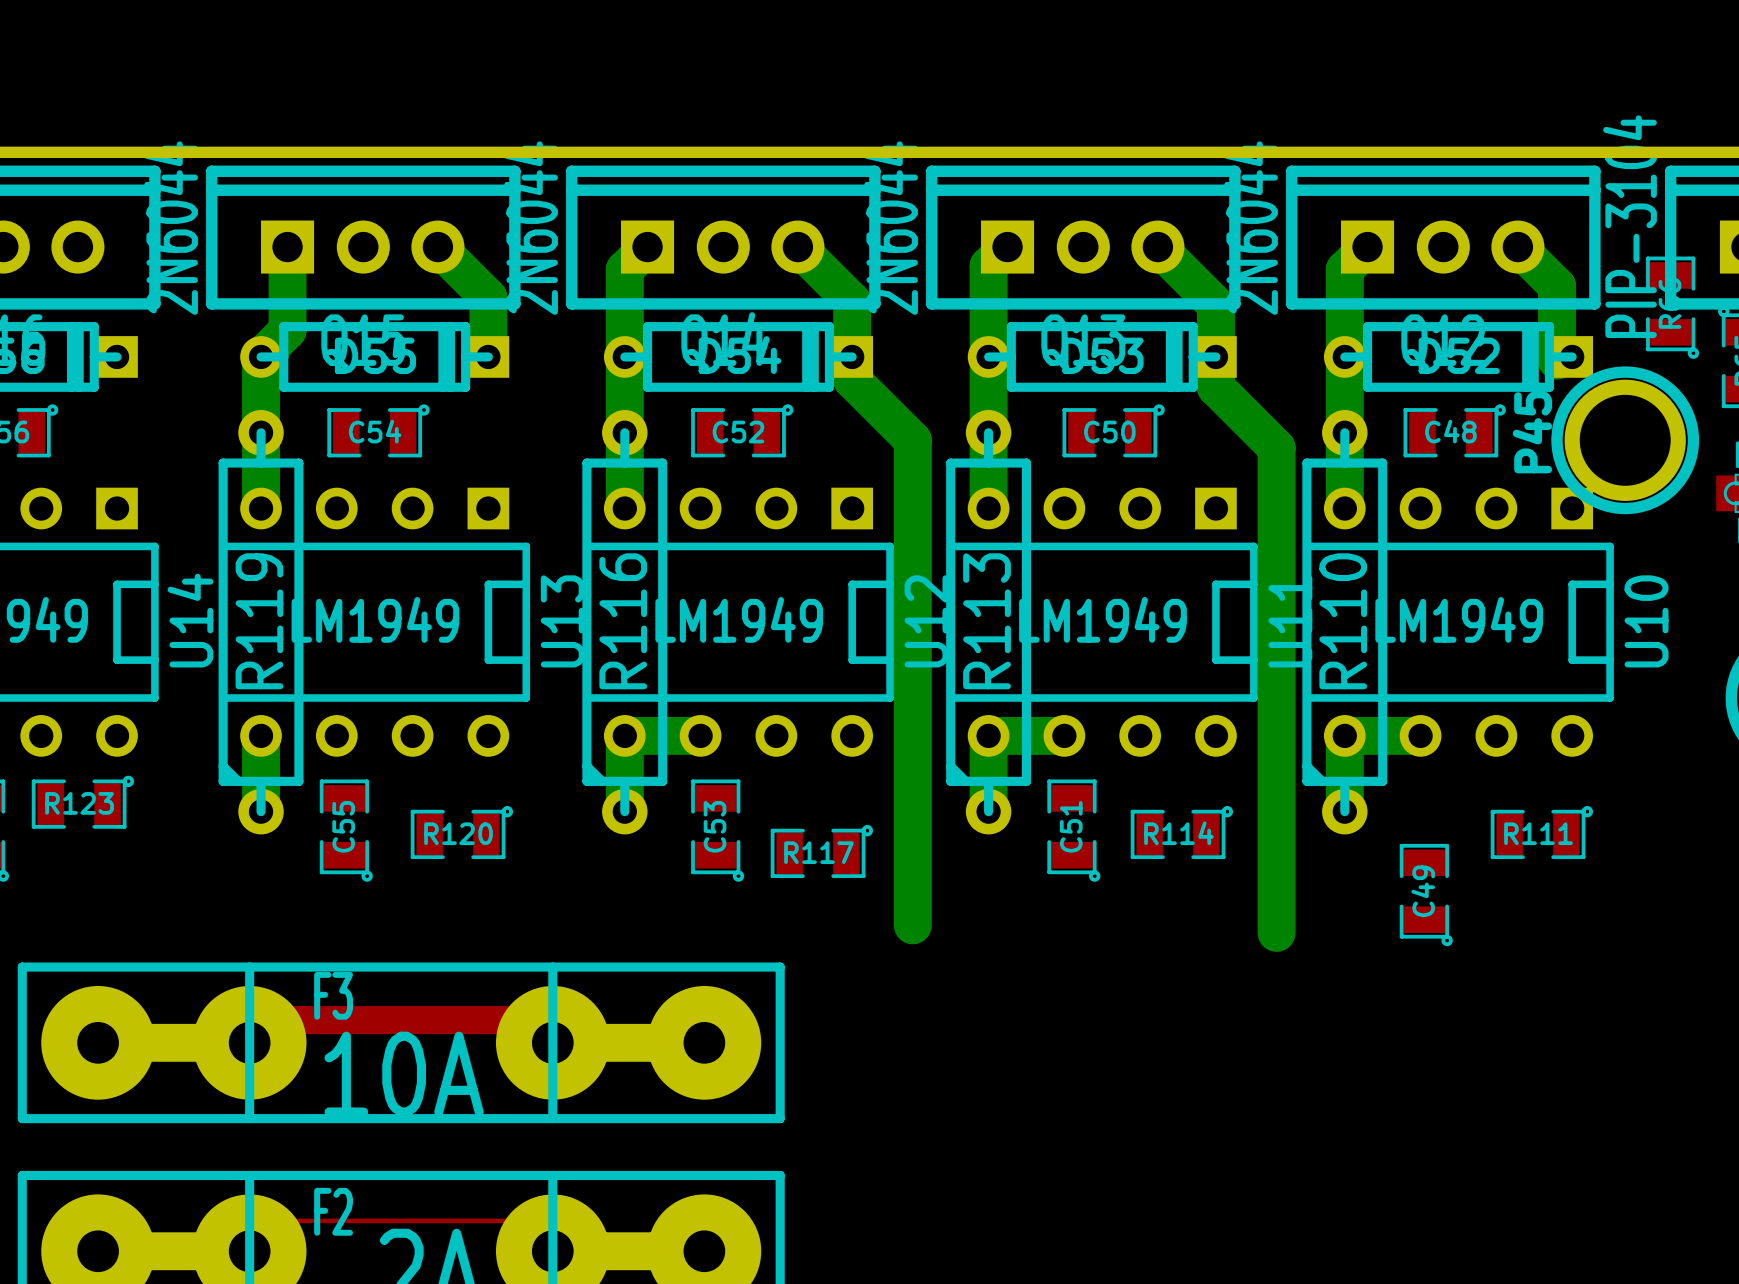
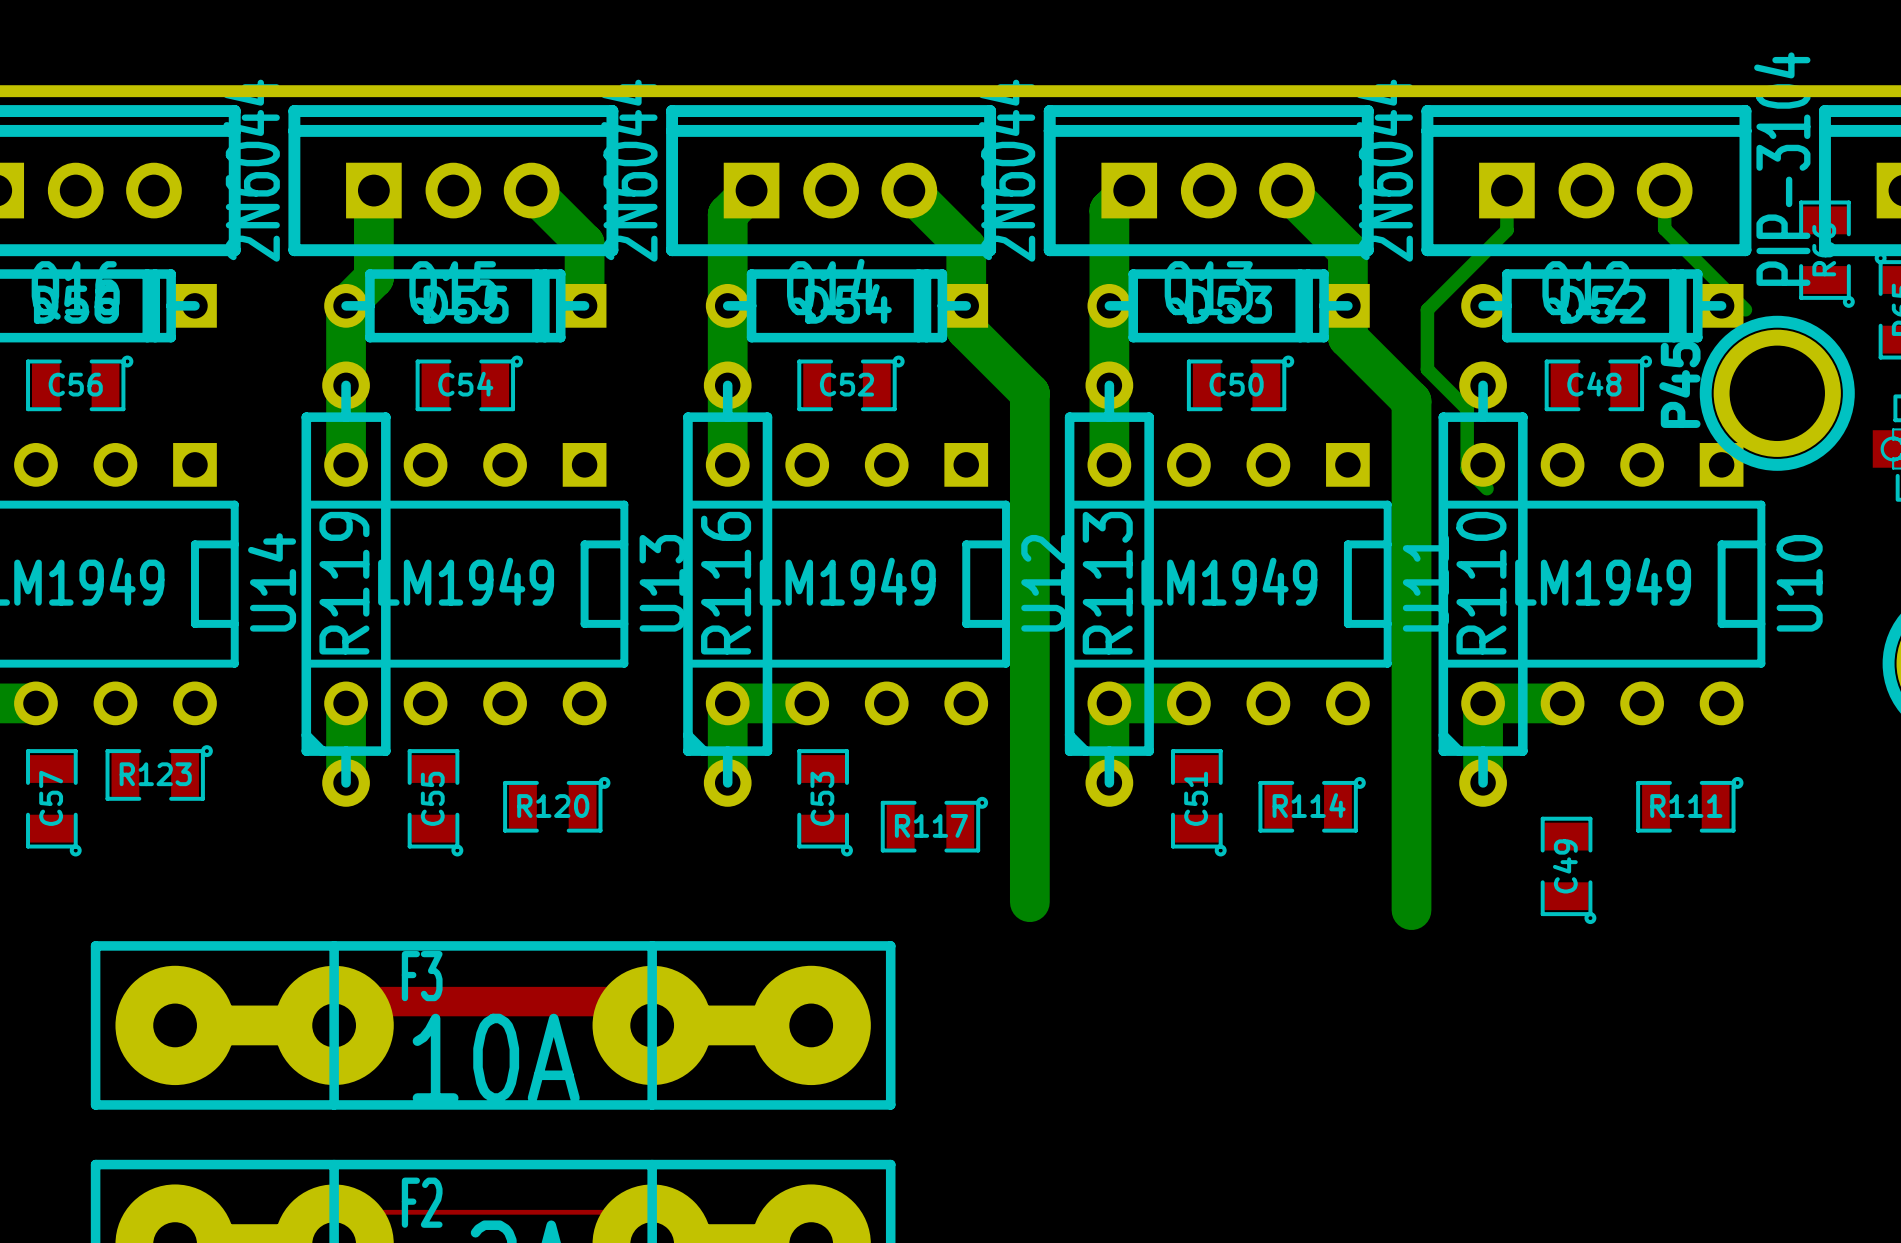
bottom track: (1367, 247) (1344, 269) (1344, 508) -> (1506, 190) (1506, 230) (1427, 309) (1427, 369) (1467, 409) (1467, 468) (1487, 488)
bottom track: (1517, 247) (1557, 286) (1557, 360) -> (1664, 190) (1664, 229) (1745, 309)

